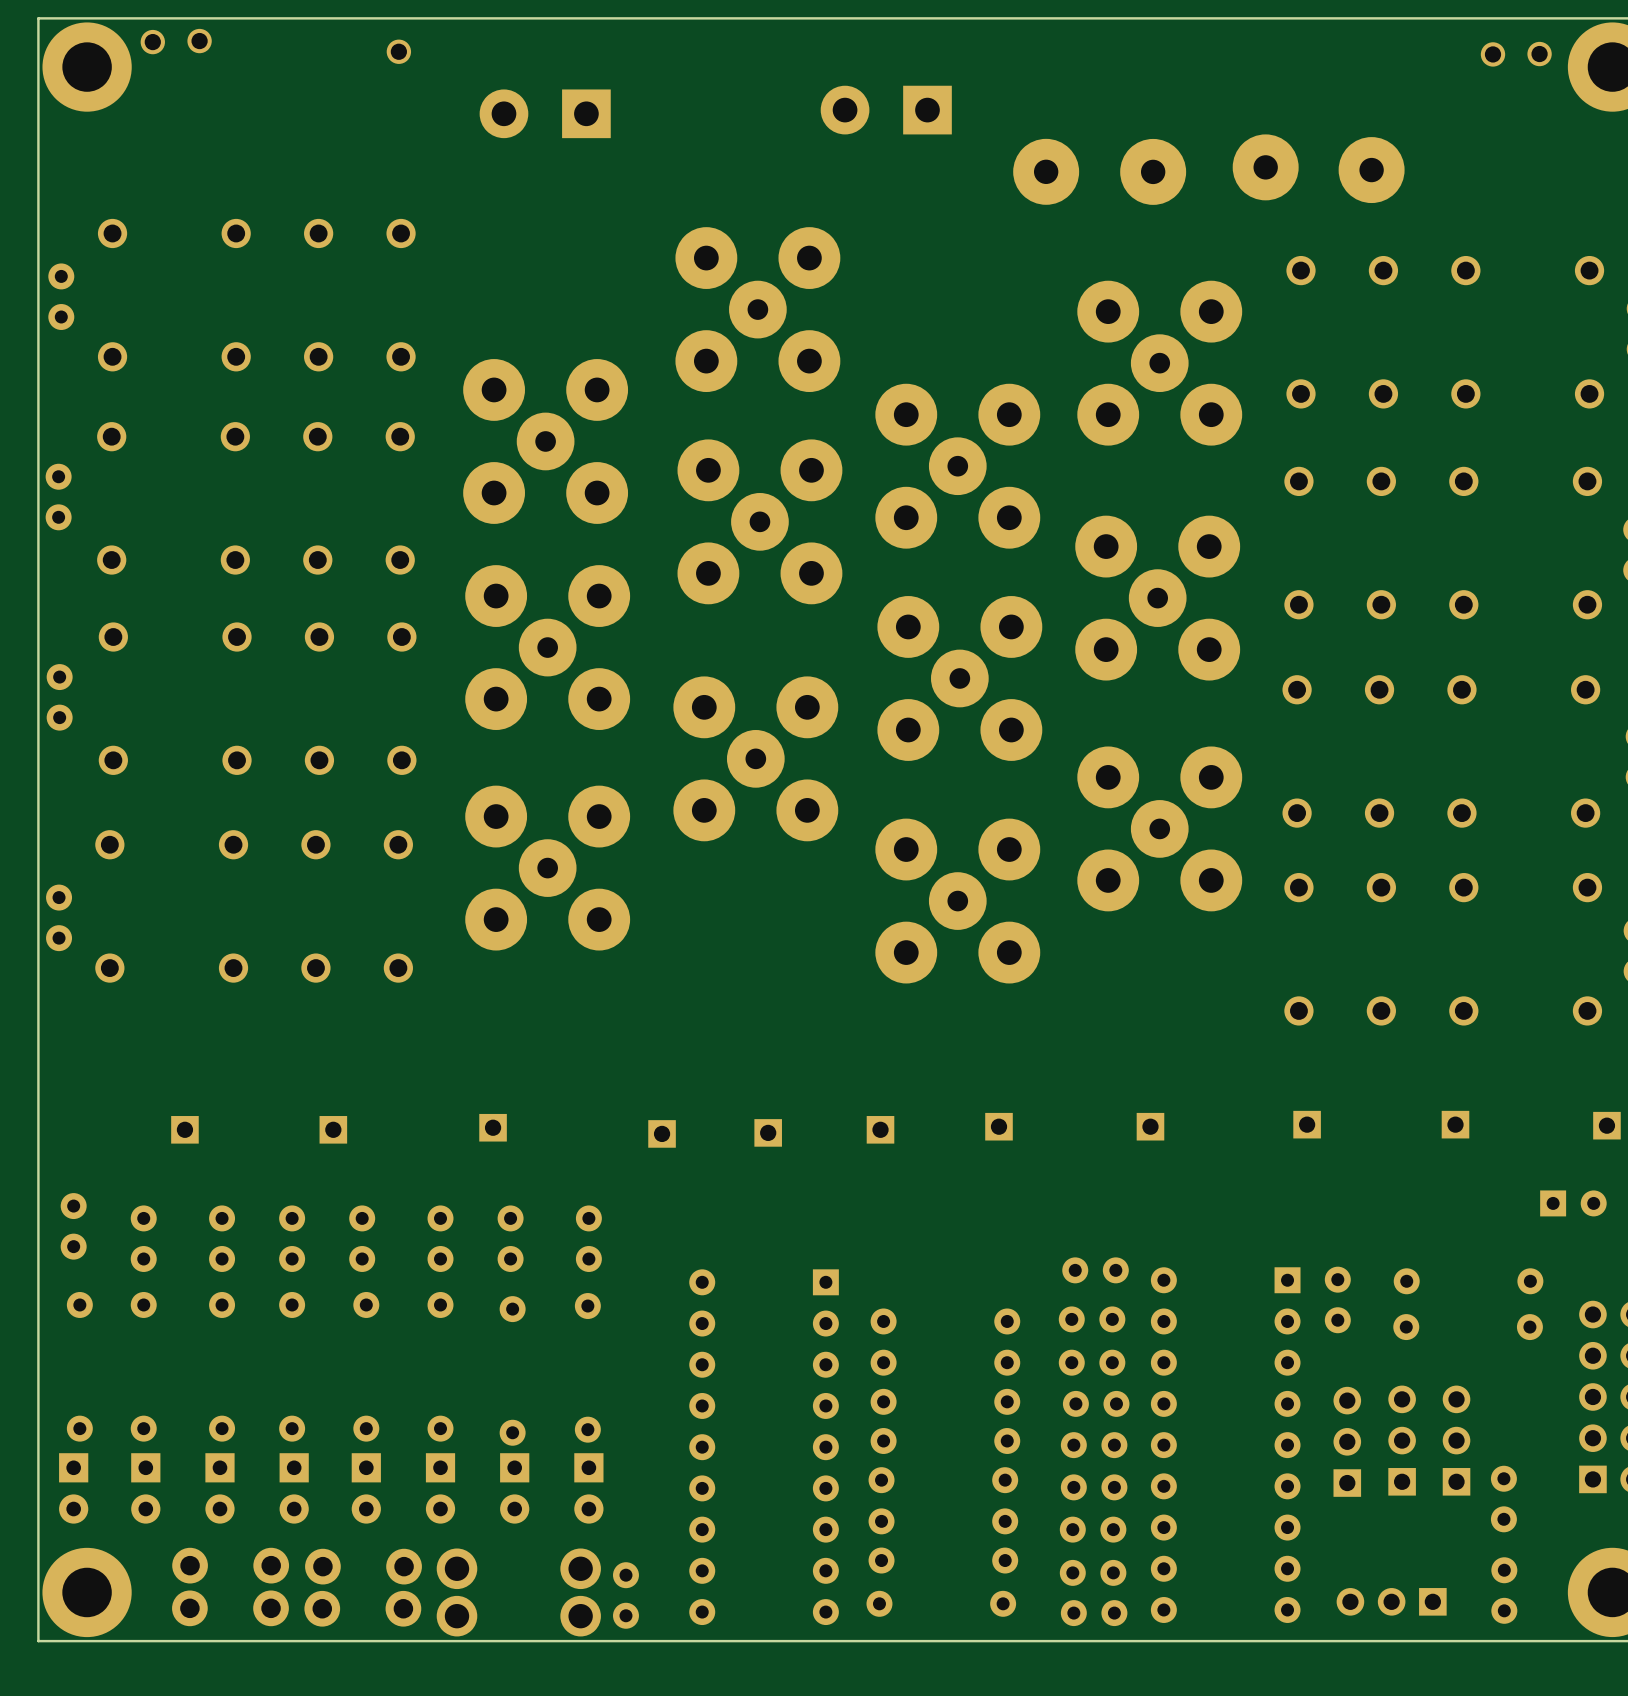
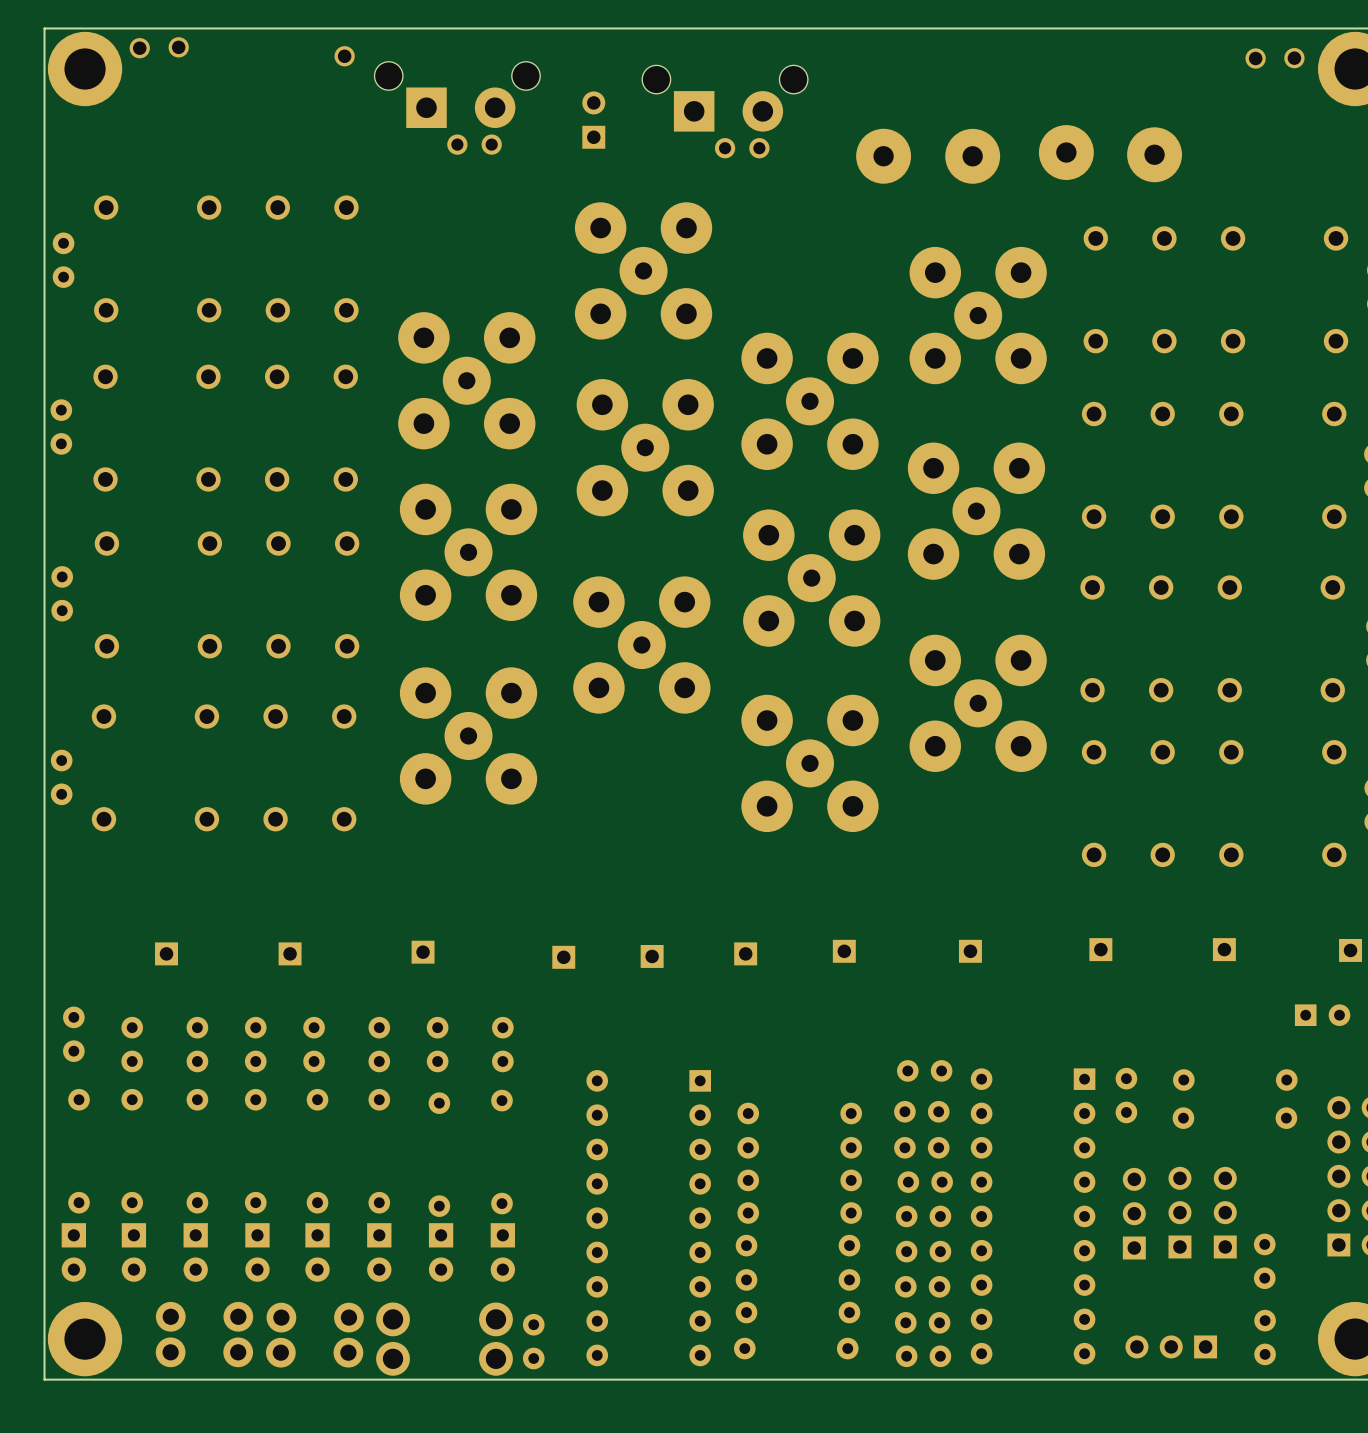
part footprint: [479, 89, 611, 139] -> [374, 61, 541, 155]
part: (886, 110) -> none
part: none -> (725, 111)
part: none -> (593, 120)

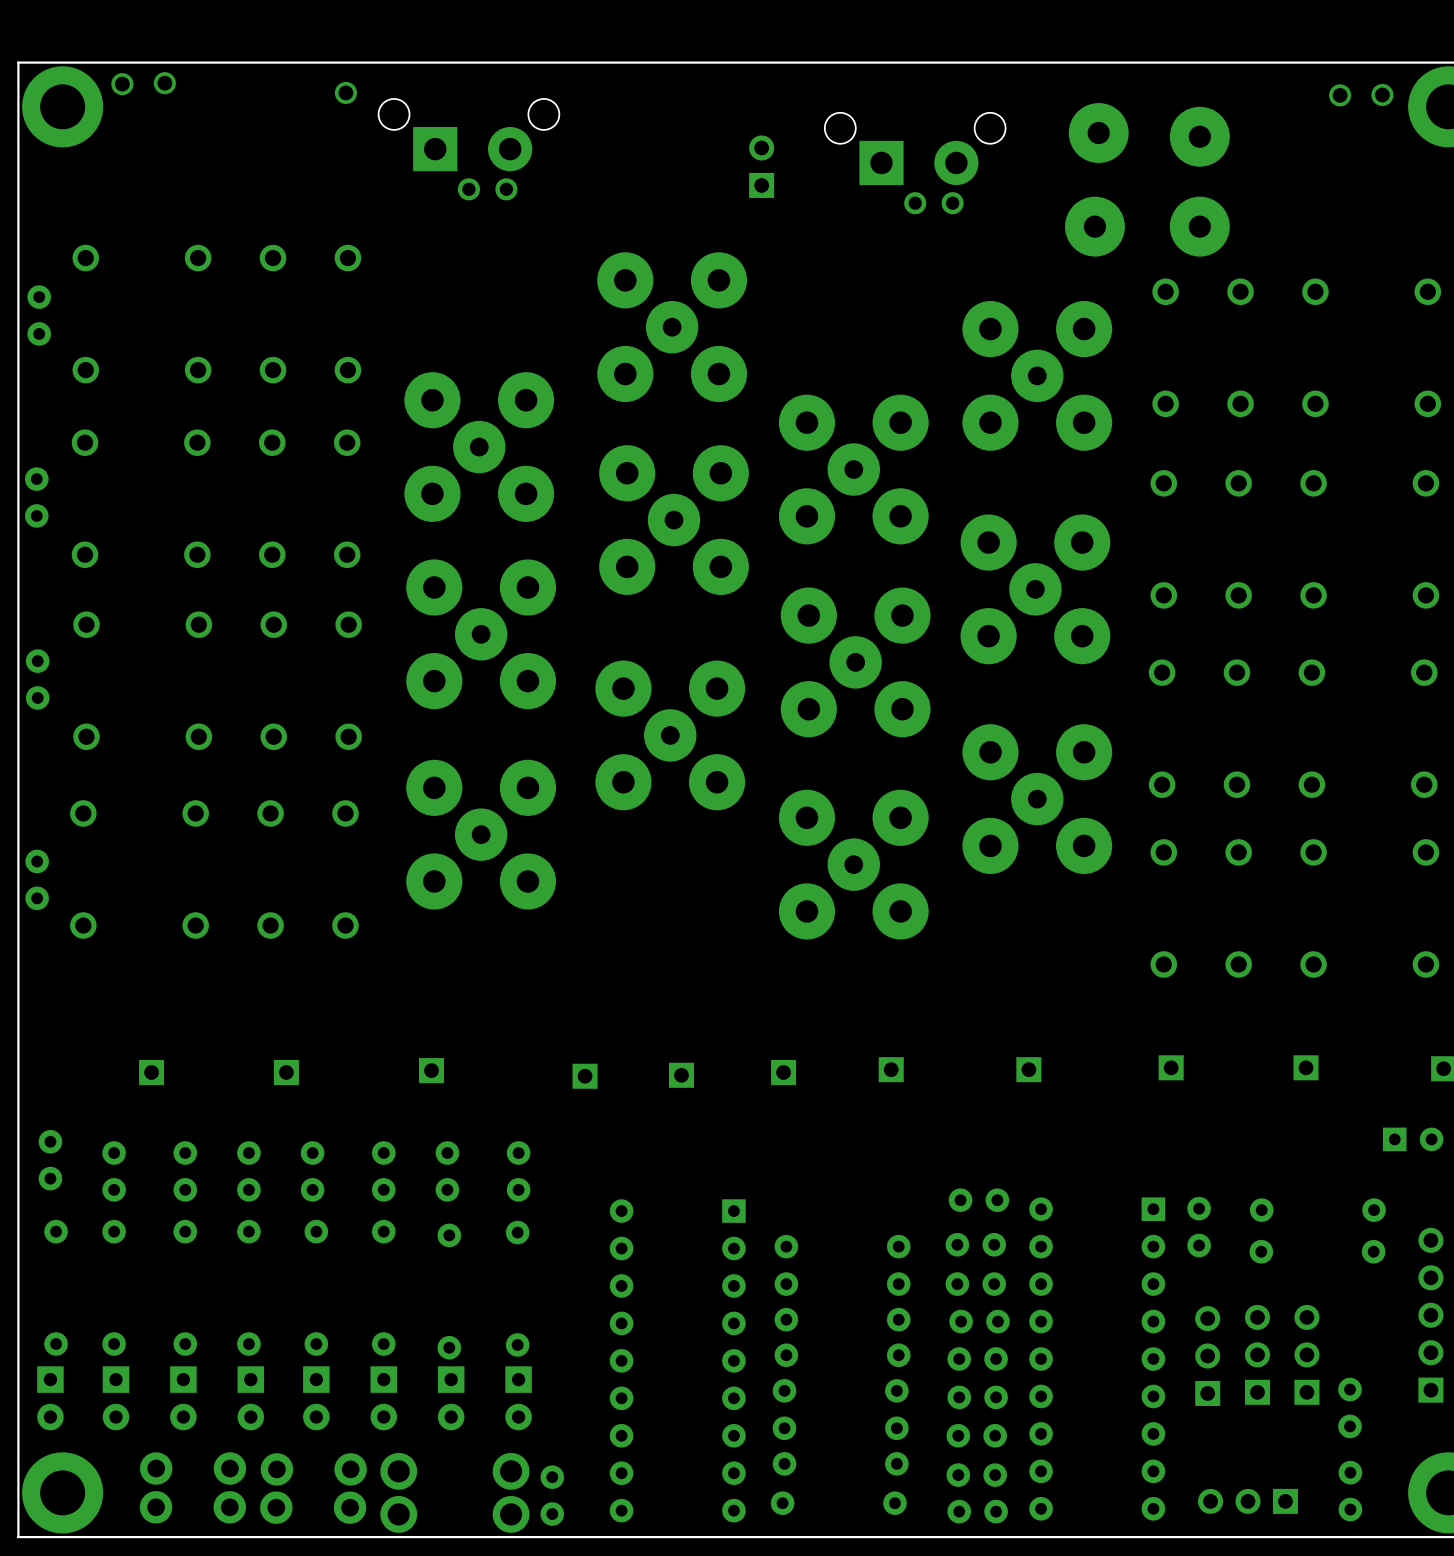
part footprint: [642, 65, 808, 159] -> [749, 135, 775, 198]
part: none -> (1098, 133)
part: none -> (1199, 136)
part: (593, 120) -> none
part: none -> (915, 163)
part: (1066, 152) -> none
part: (1154, 154) -> none
part: (883, 156) -> none
part: (972, 156) -> none
part: none -> (1094, 226)
part: none -> (1199, 226)

